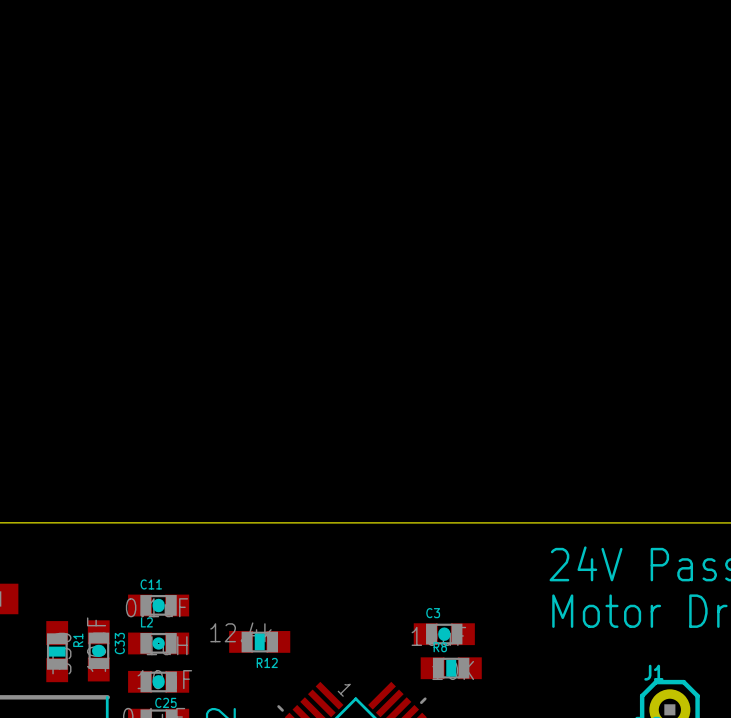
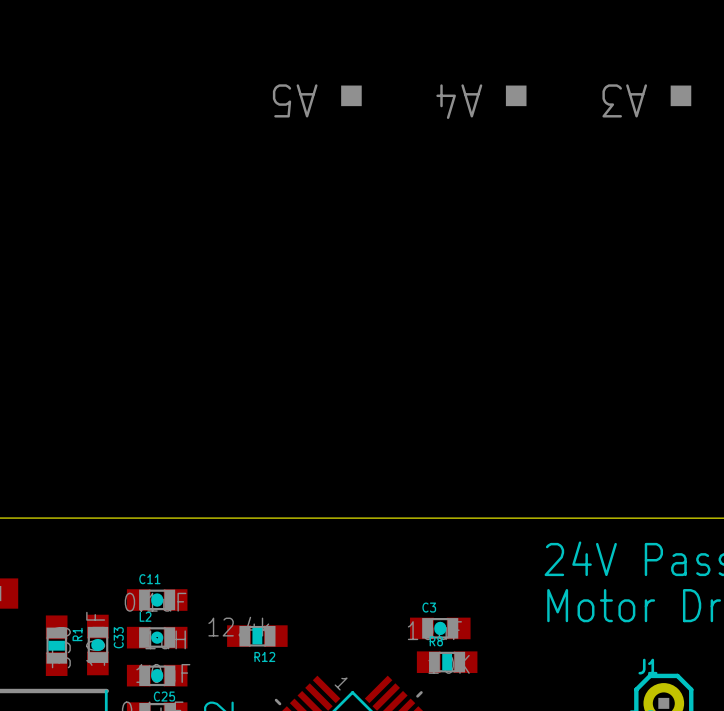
drawing: none -> [341, 85, 362, 107]
drawing: none -> [505, 85, 527, 107]
drawing: none -> [670, 85, 692, 107]
text: none -> A5 (295, 100)
text: none -> A3 (624, 100)
text: none -> A4 (459, 101)

